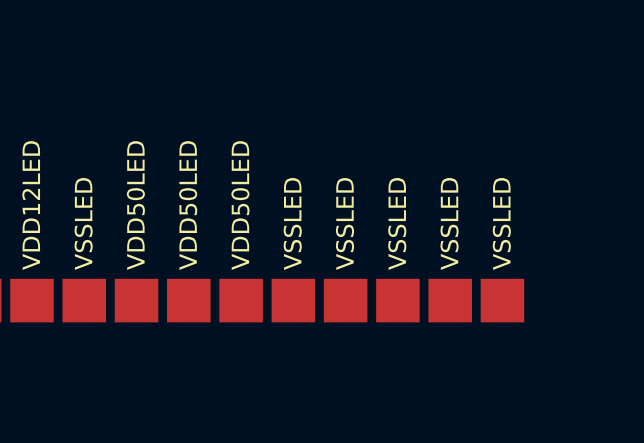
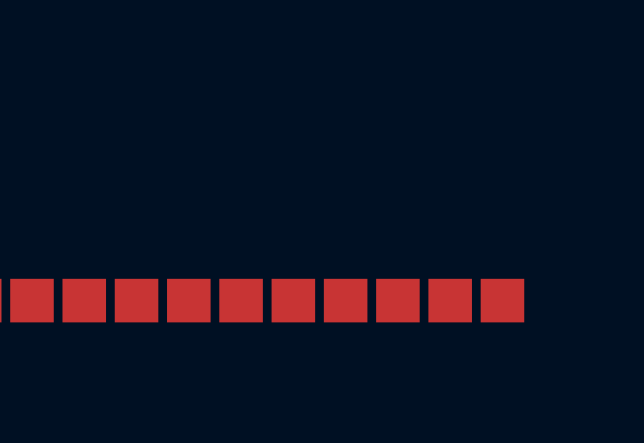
text: VDD12LED (31, 205) -> none
text: VDD50LED (135, 205) -> none
text: VDD50LED (188, 205) -> none
text: VDD50LED (240, 205) -> none
text: VSSLED (83, 223) -> none
text: VSSLED (292, 223) -> none
text: VSSLED (344, 223) -> none
text: VSSLED (397, 223) -> none
text: VSSLED (449, 223) -> none
text: VSSLED (501, 223) -> none

